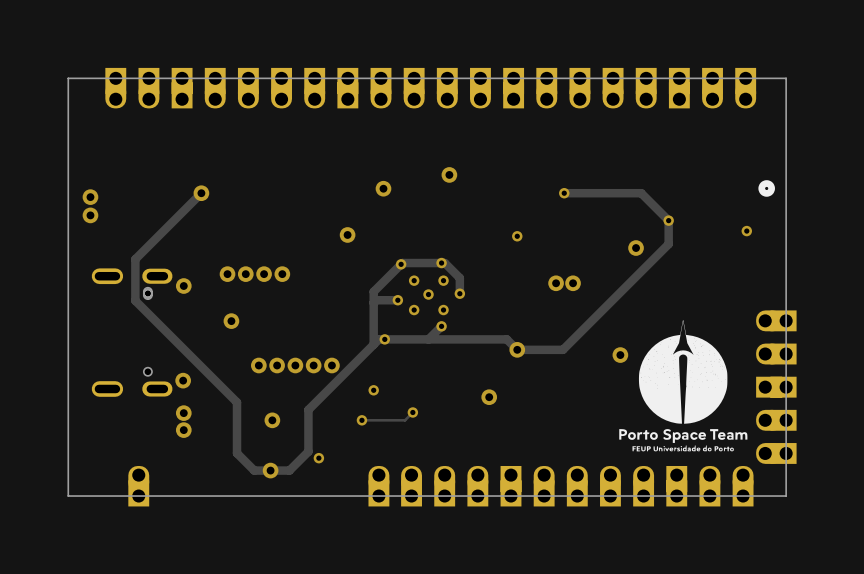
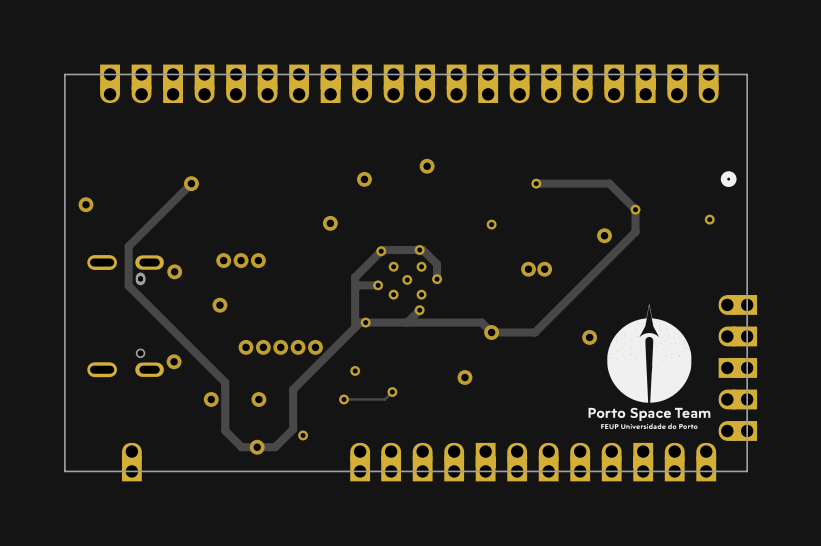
via: (90, 197) -> none
via: (227, 274) -> none
via: none -> (223, 260)
via: (245, 274) -> none
via: none -> (241, 260)
via: (264, 274) -> none
via: none -> (258, 260)
via: (282, 274) -> none
via: (183, 413) -> none
via: none -> (211, 399)
via: (183, 430) -> none

